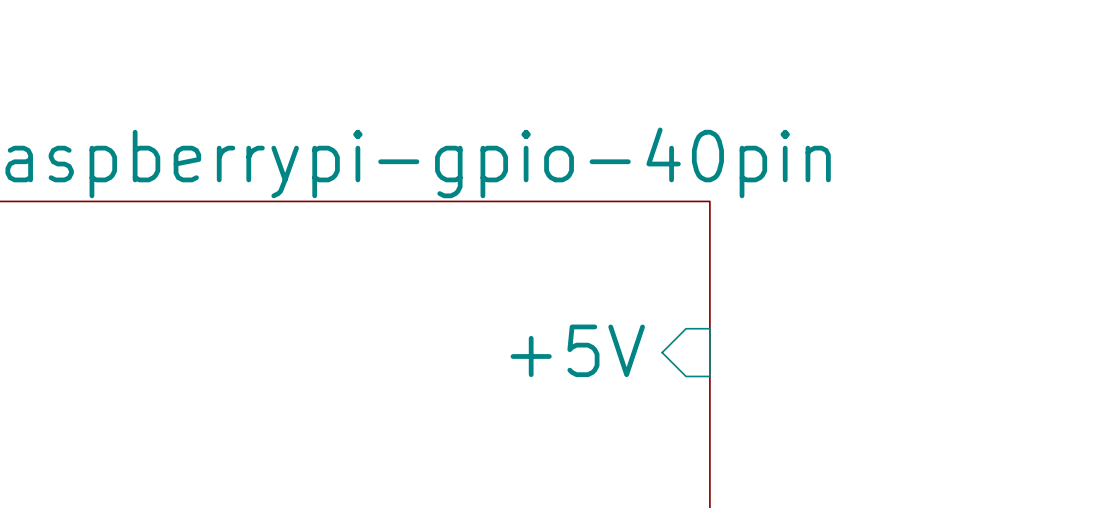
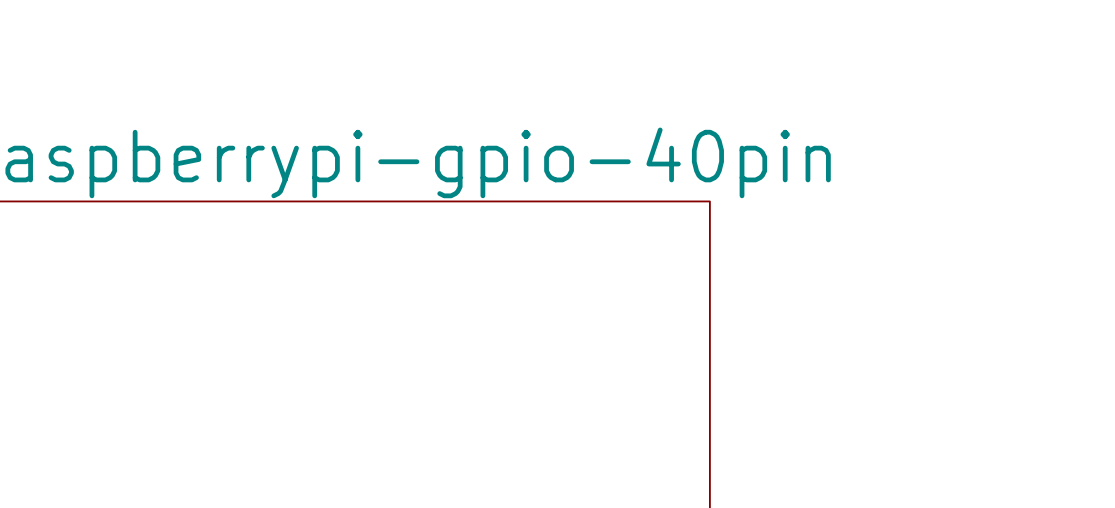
sheet pin: +5V (577, 350) -> none

